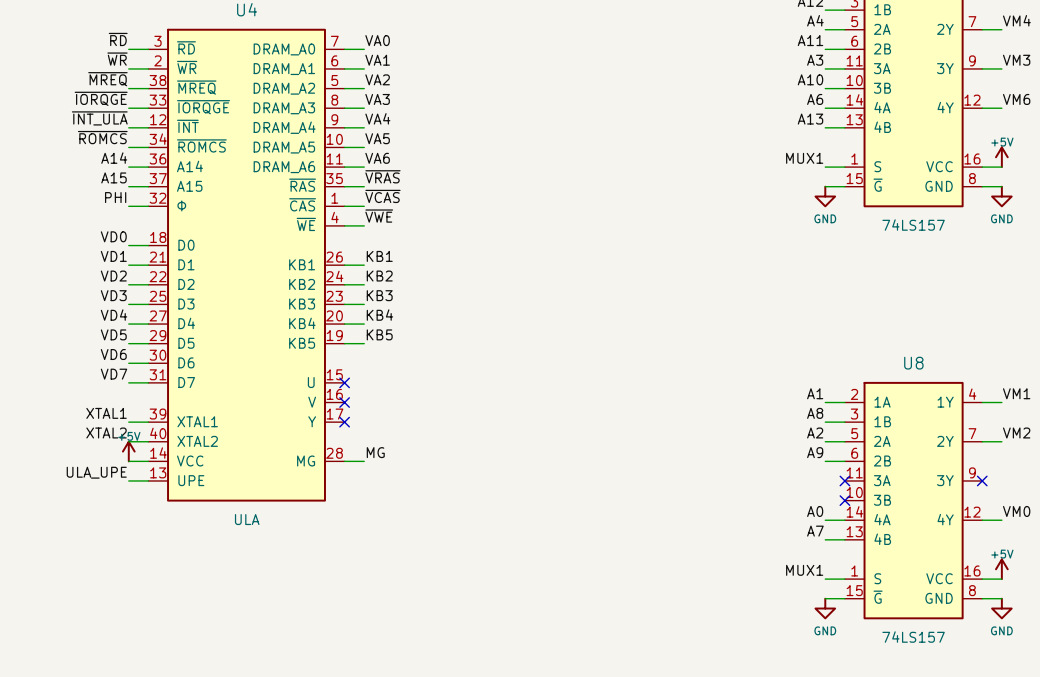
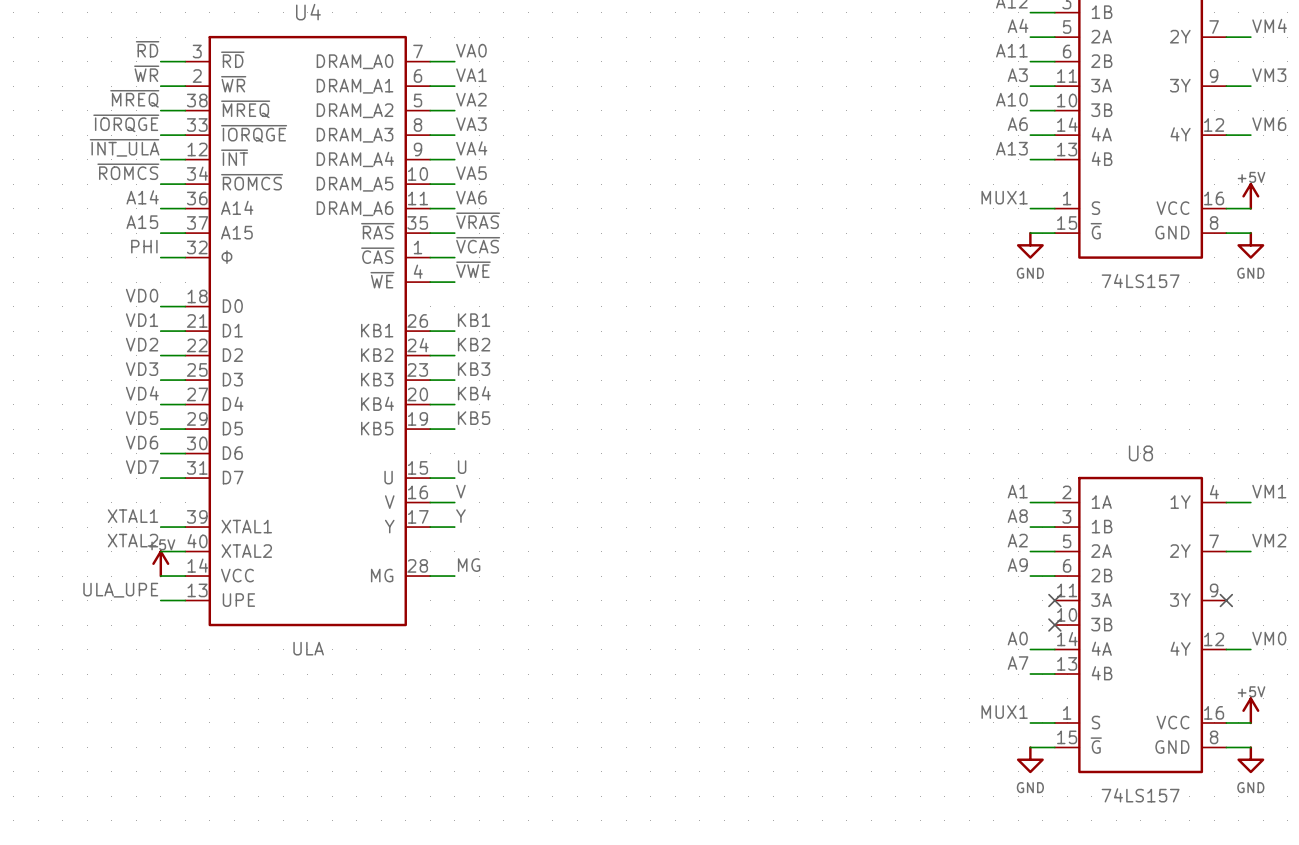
label: none -> U (462, 467)
wire: none -> (430, 478) (454, 478)
no-connect mark: (344, 382) -> none
label: none -> V (460, 491)
wire: none -> (430, 502) (454, 502)
no-connect mark: (344, 402) -> none
label: none -> Y (460, 516)
wire: none -> (430, 527) (454, 527)
no-connect mark: (344, 422) -> none

